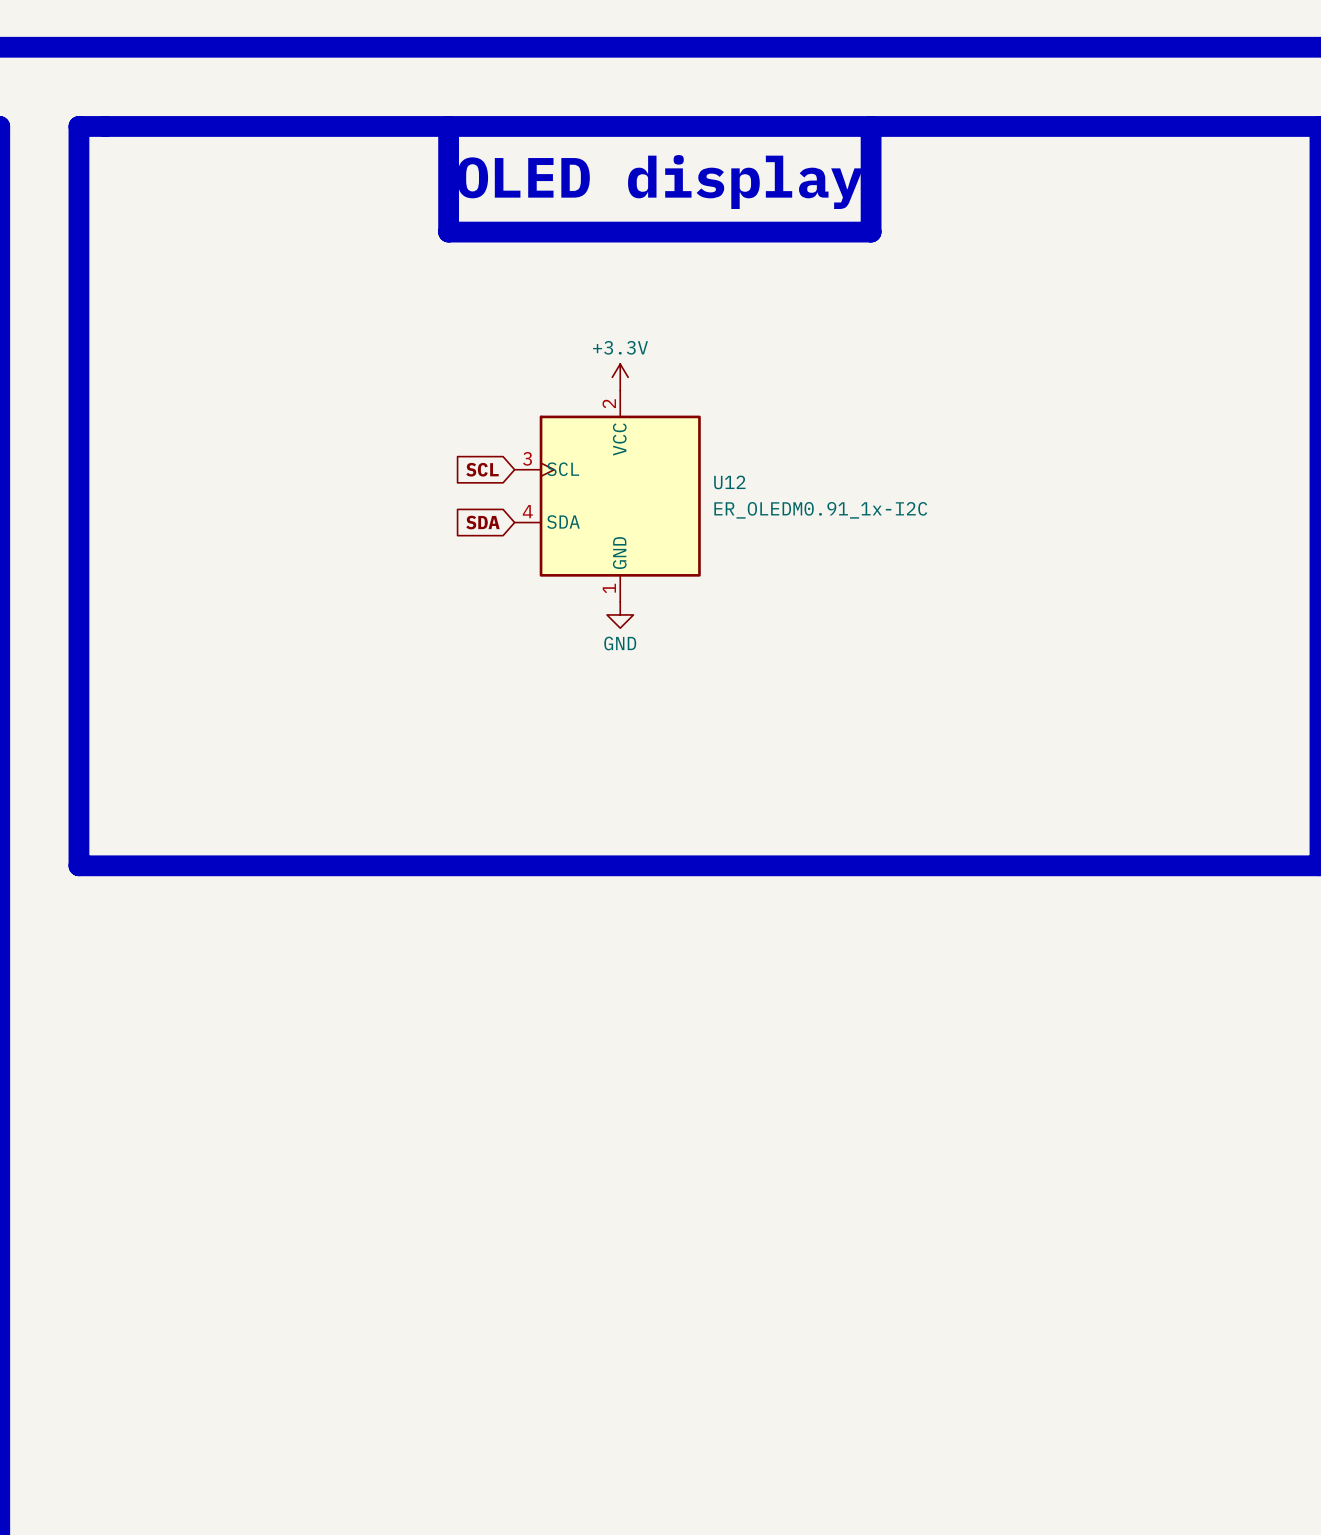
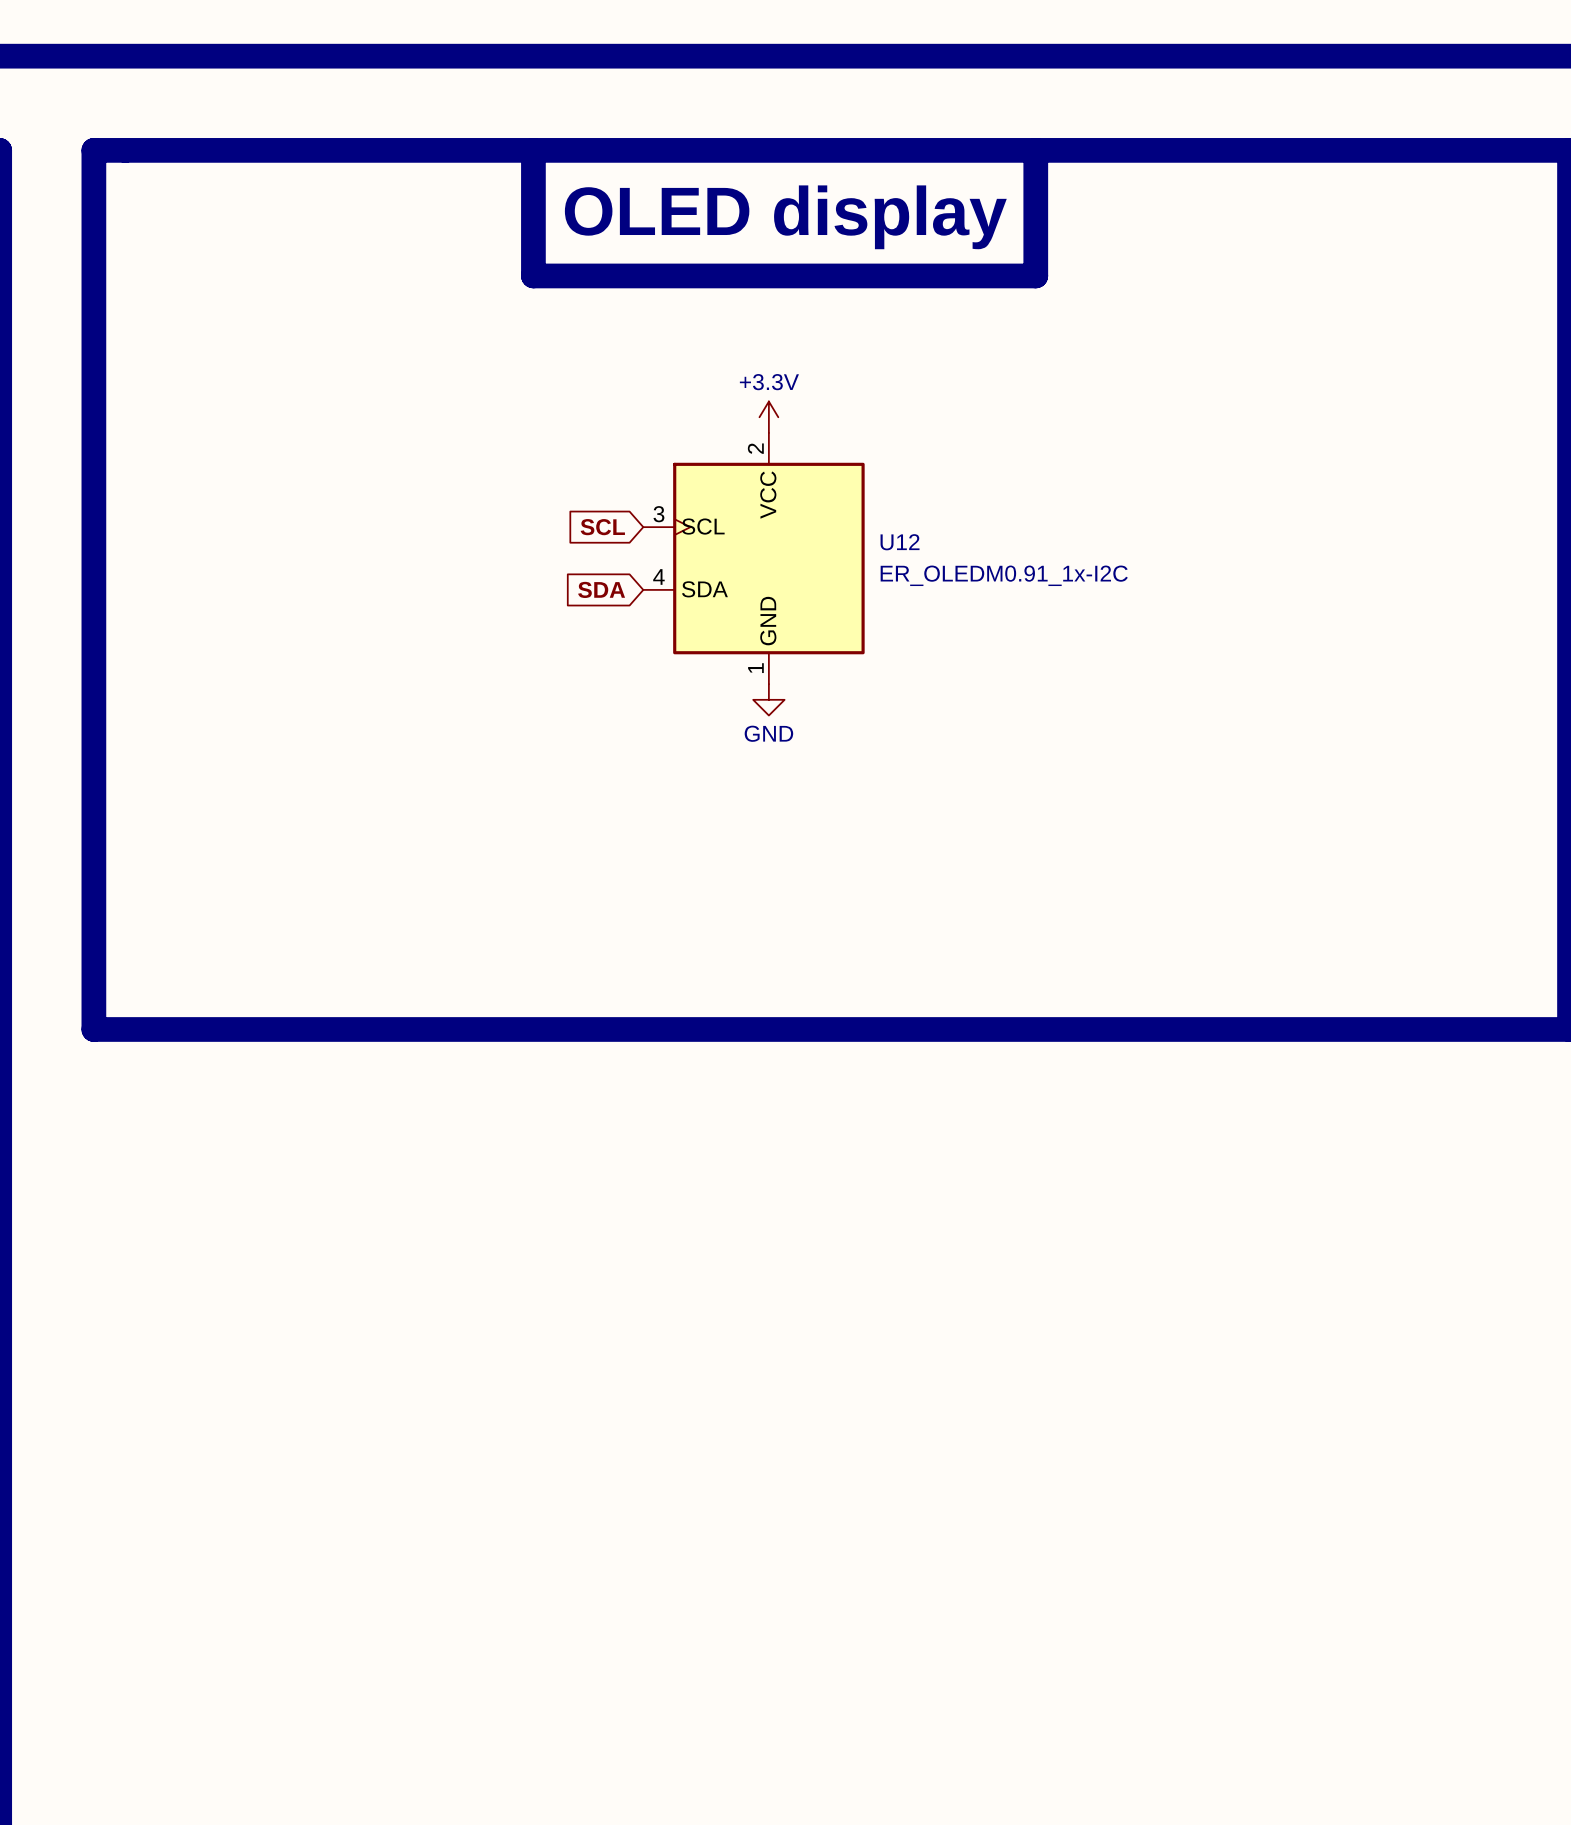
power symbol position: +3.3V (620, 377) -> +3.3V (768, 417)
global label position: SCL (482, 469) -> SCL (602, 527)
U12 position: (607, 496) -> (753, 558)
global label position: SDA (482, 522) -> SDA (601, 589)
power symbol position: GND (620, 614) -> GND (768, 699)

